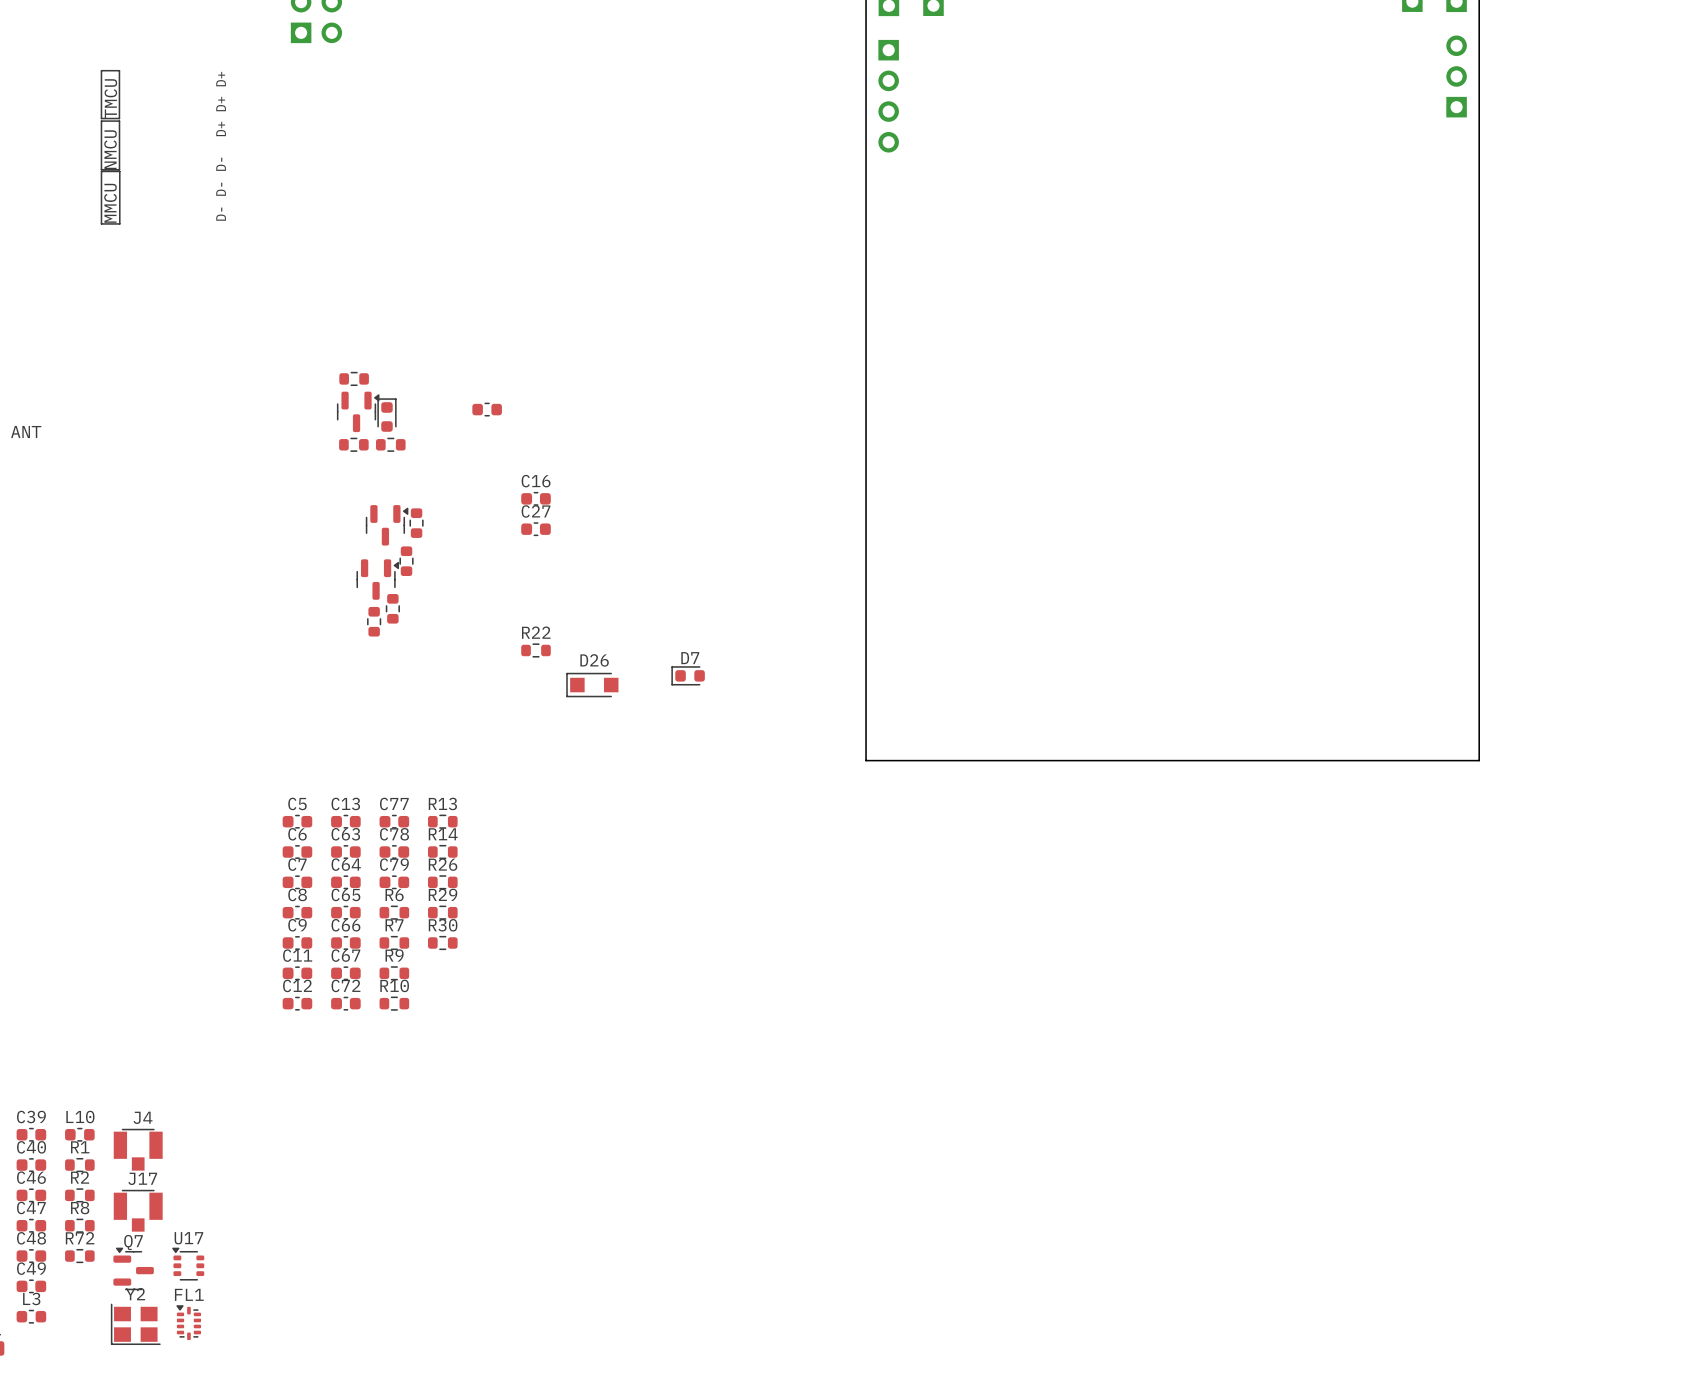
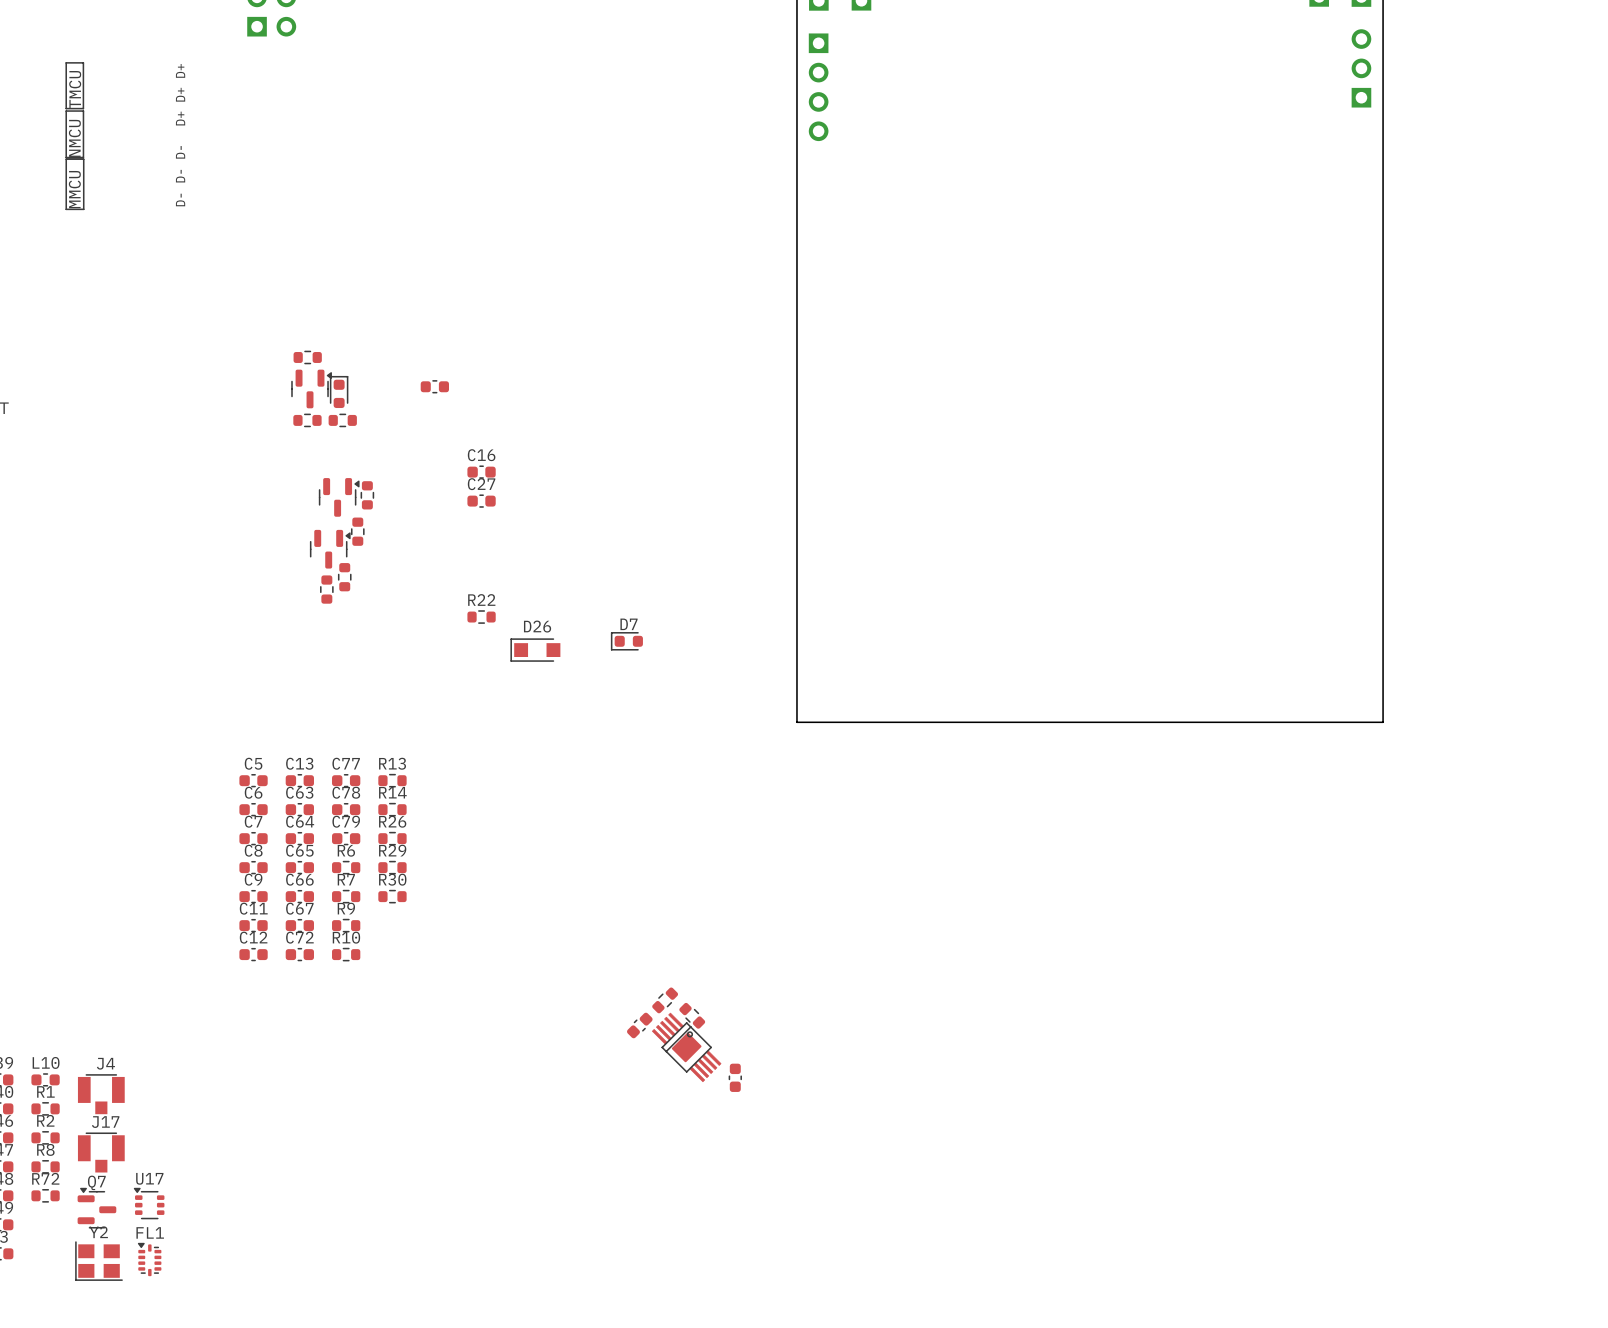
part: none -> (665, 1000)
part: none -> (692, 1015)
part: none -> (639, 1025)
part: none -> (686, 1047)
part: none -> (735, 1077)

